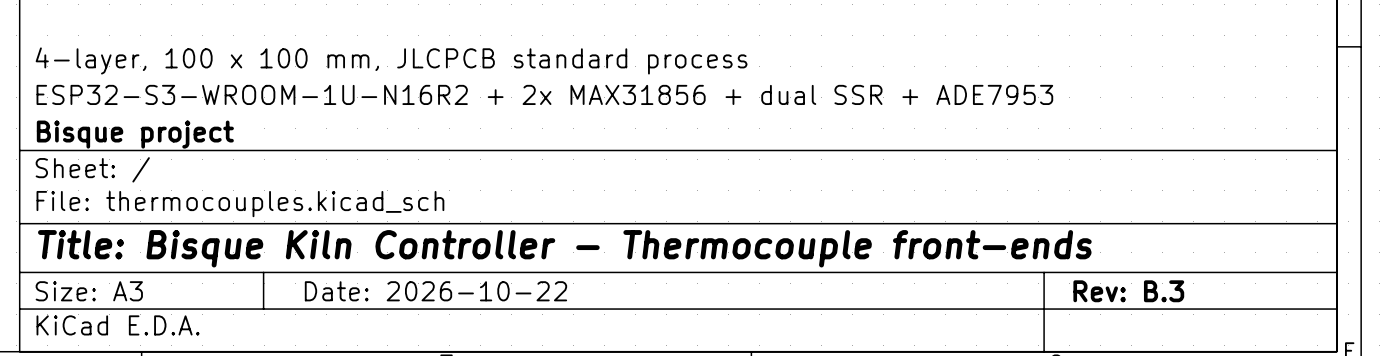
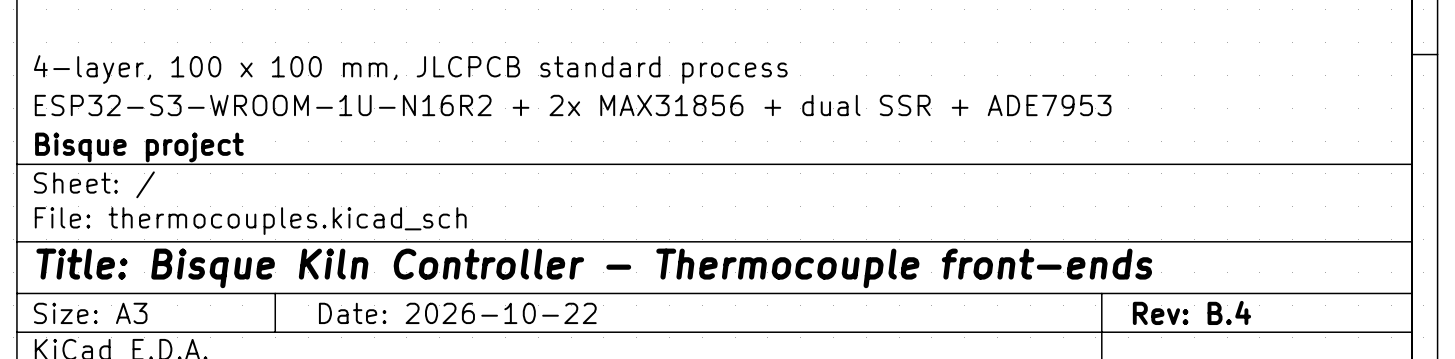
title block: Rev: B.3 (1128, 291) -> Rev: B.4 (1191, 312)

